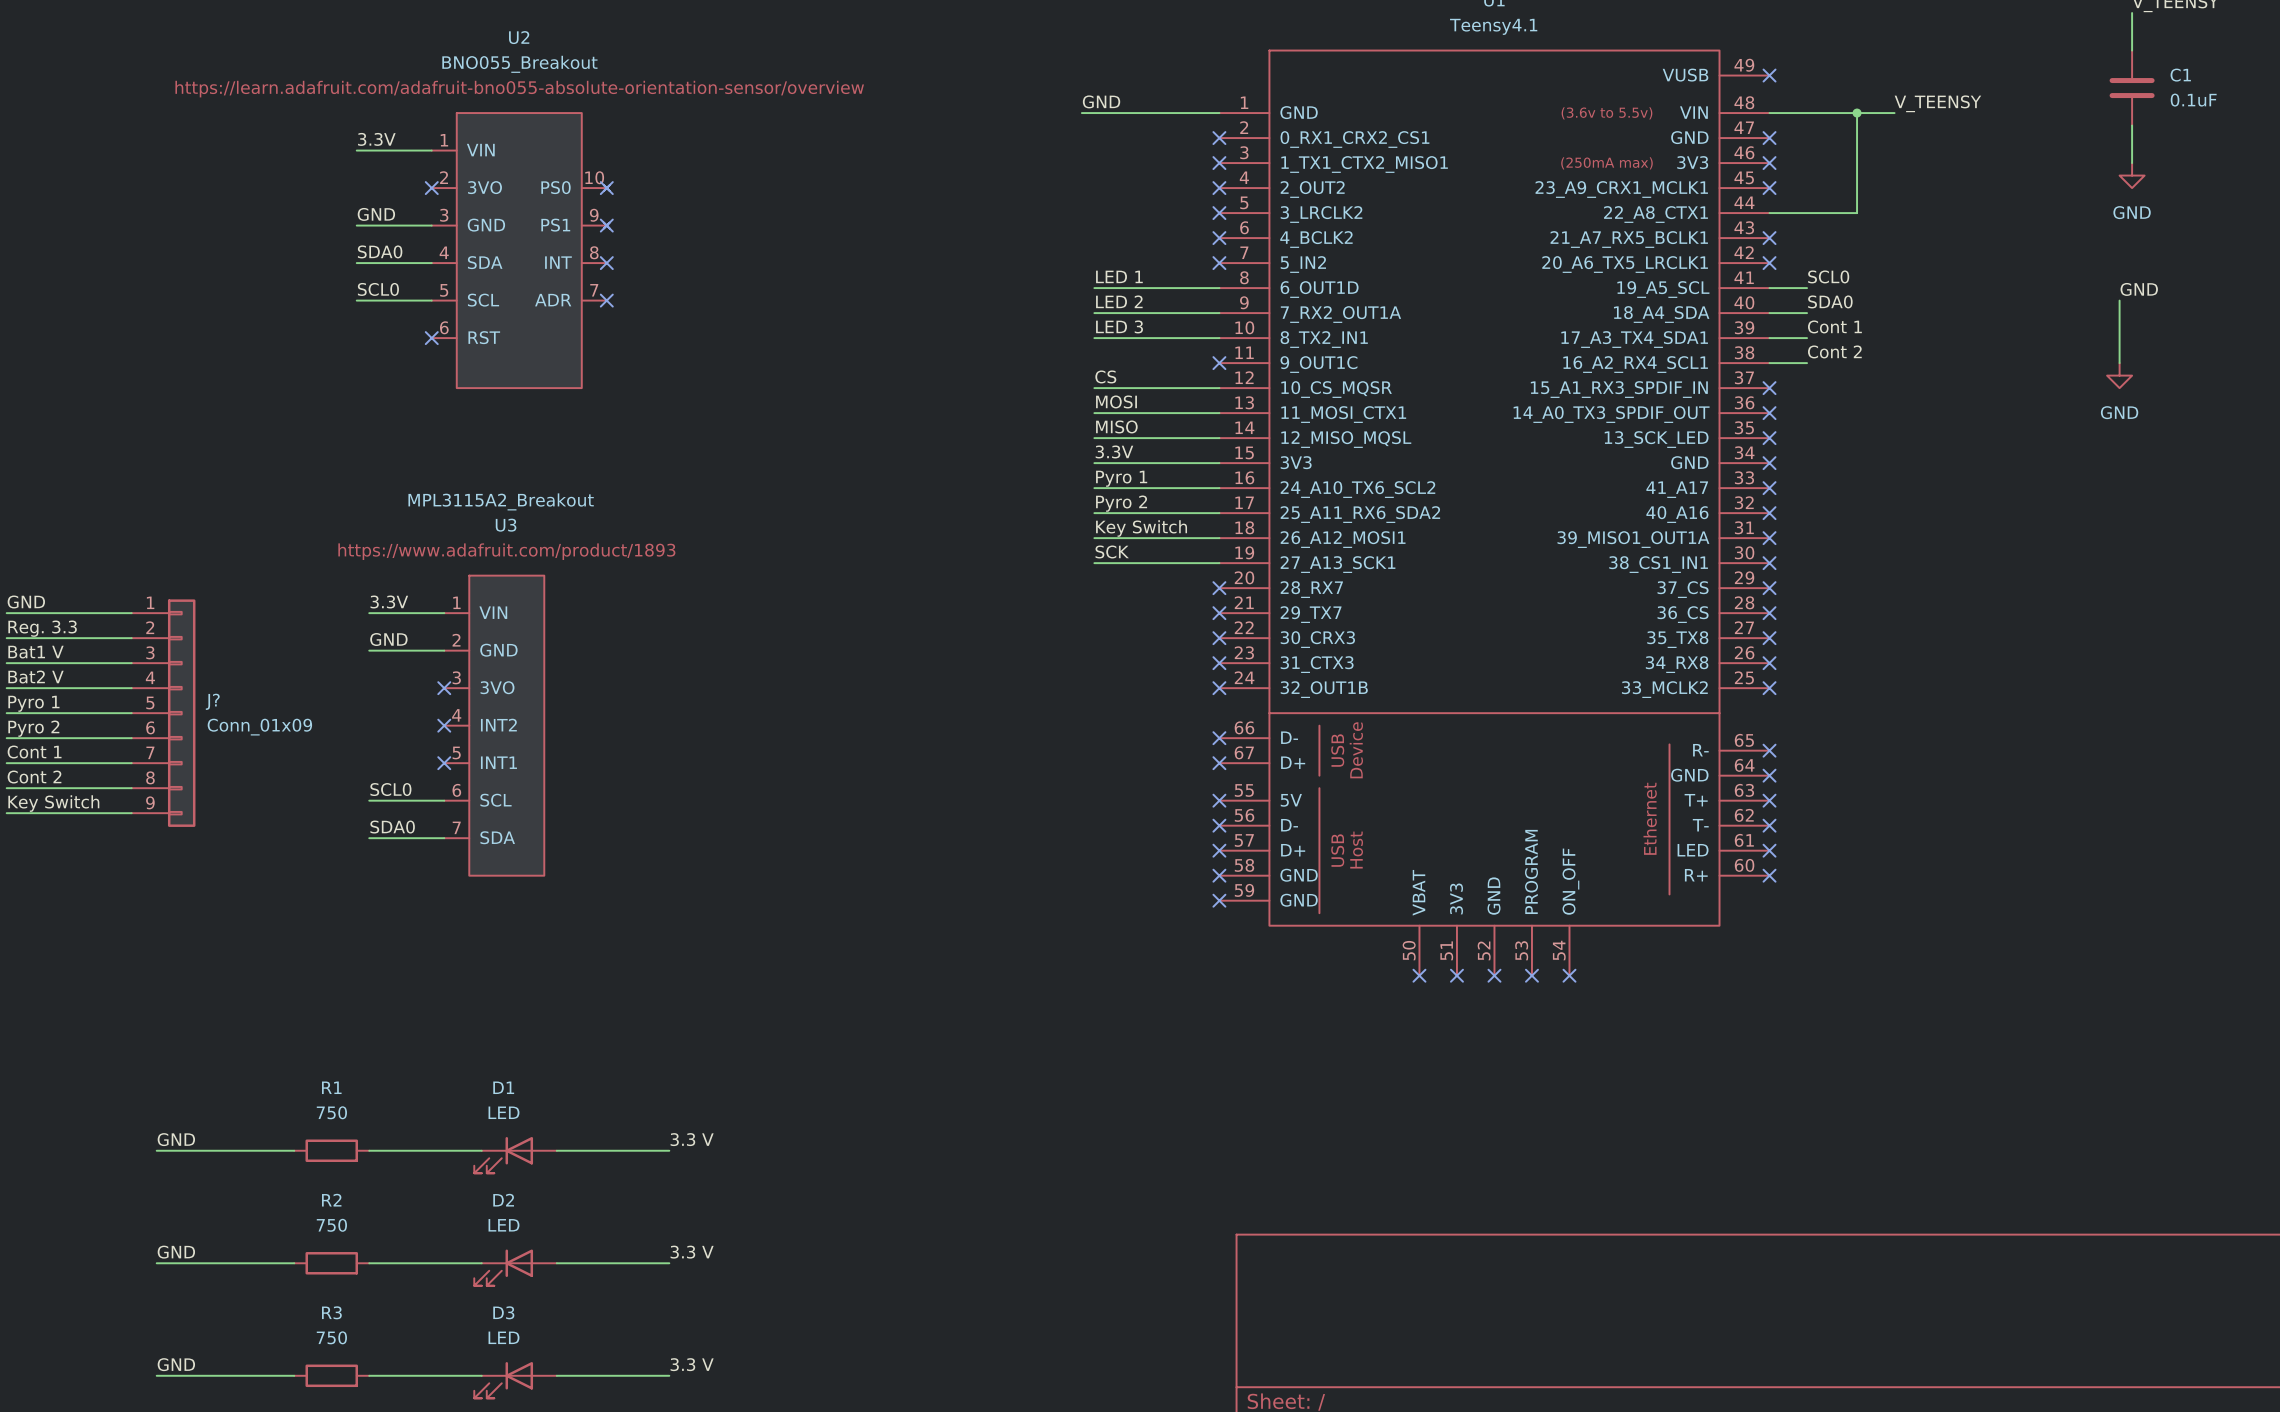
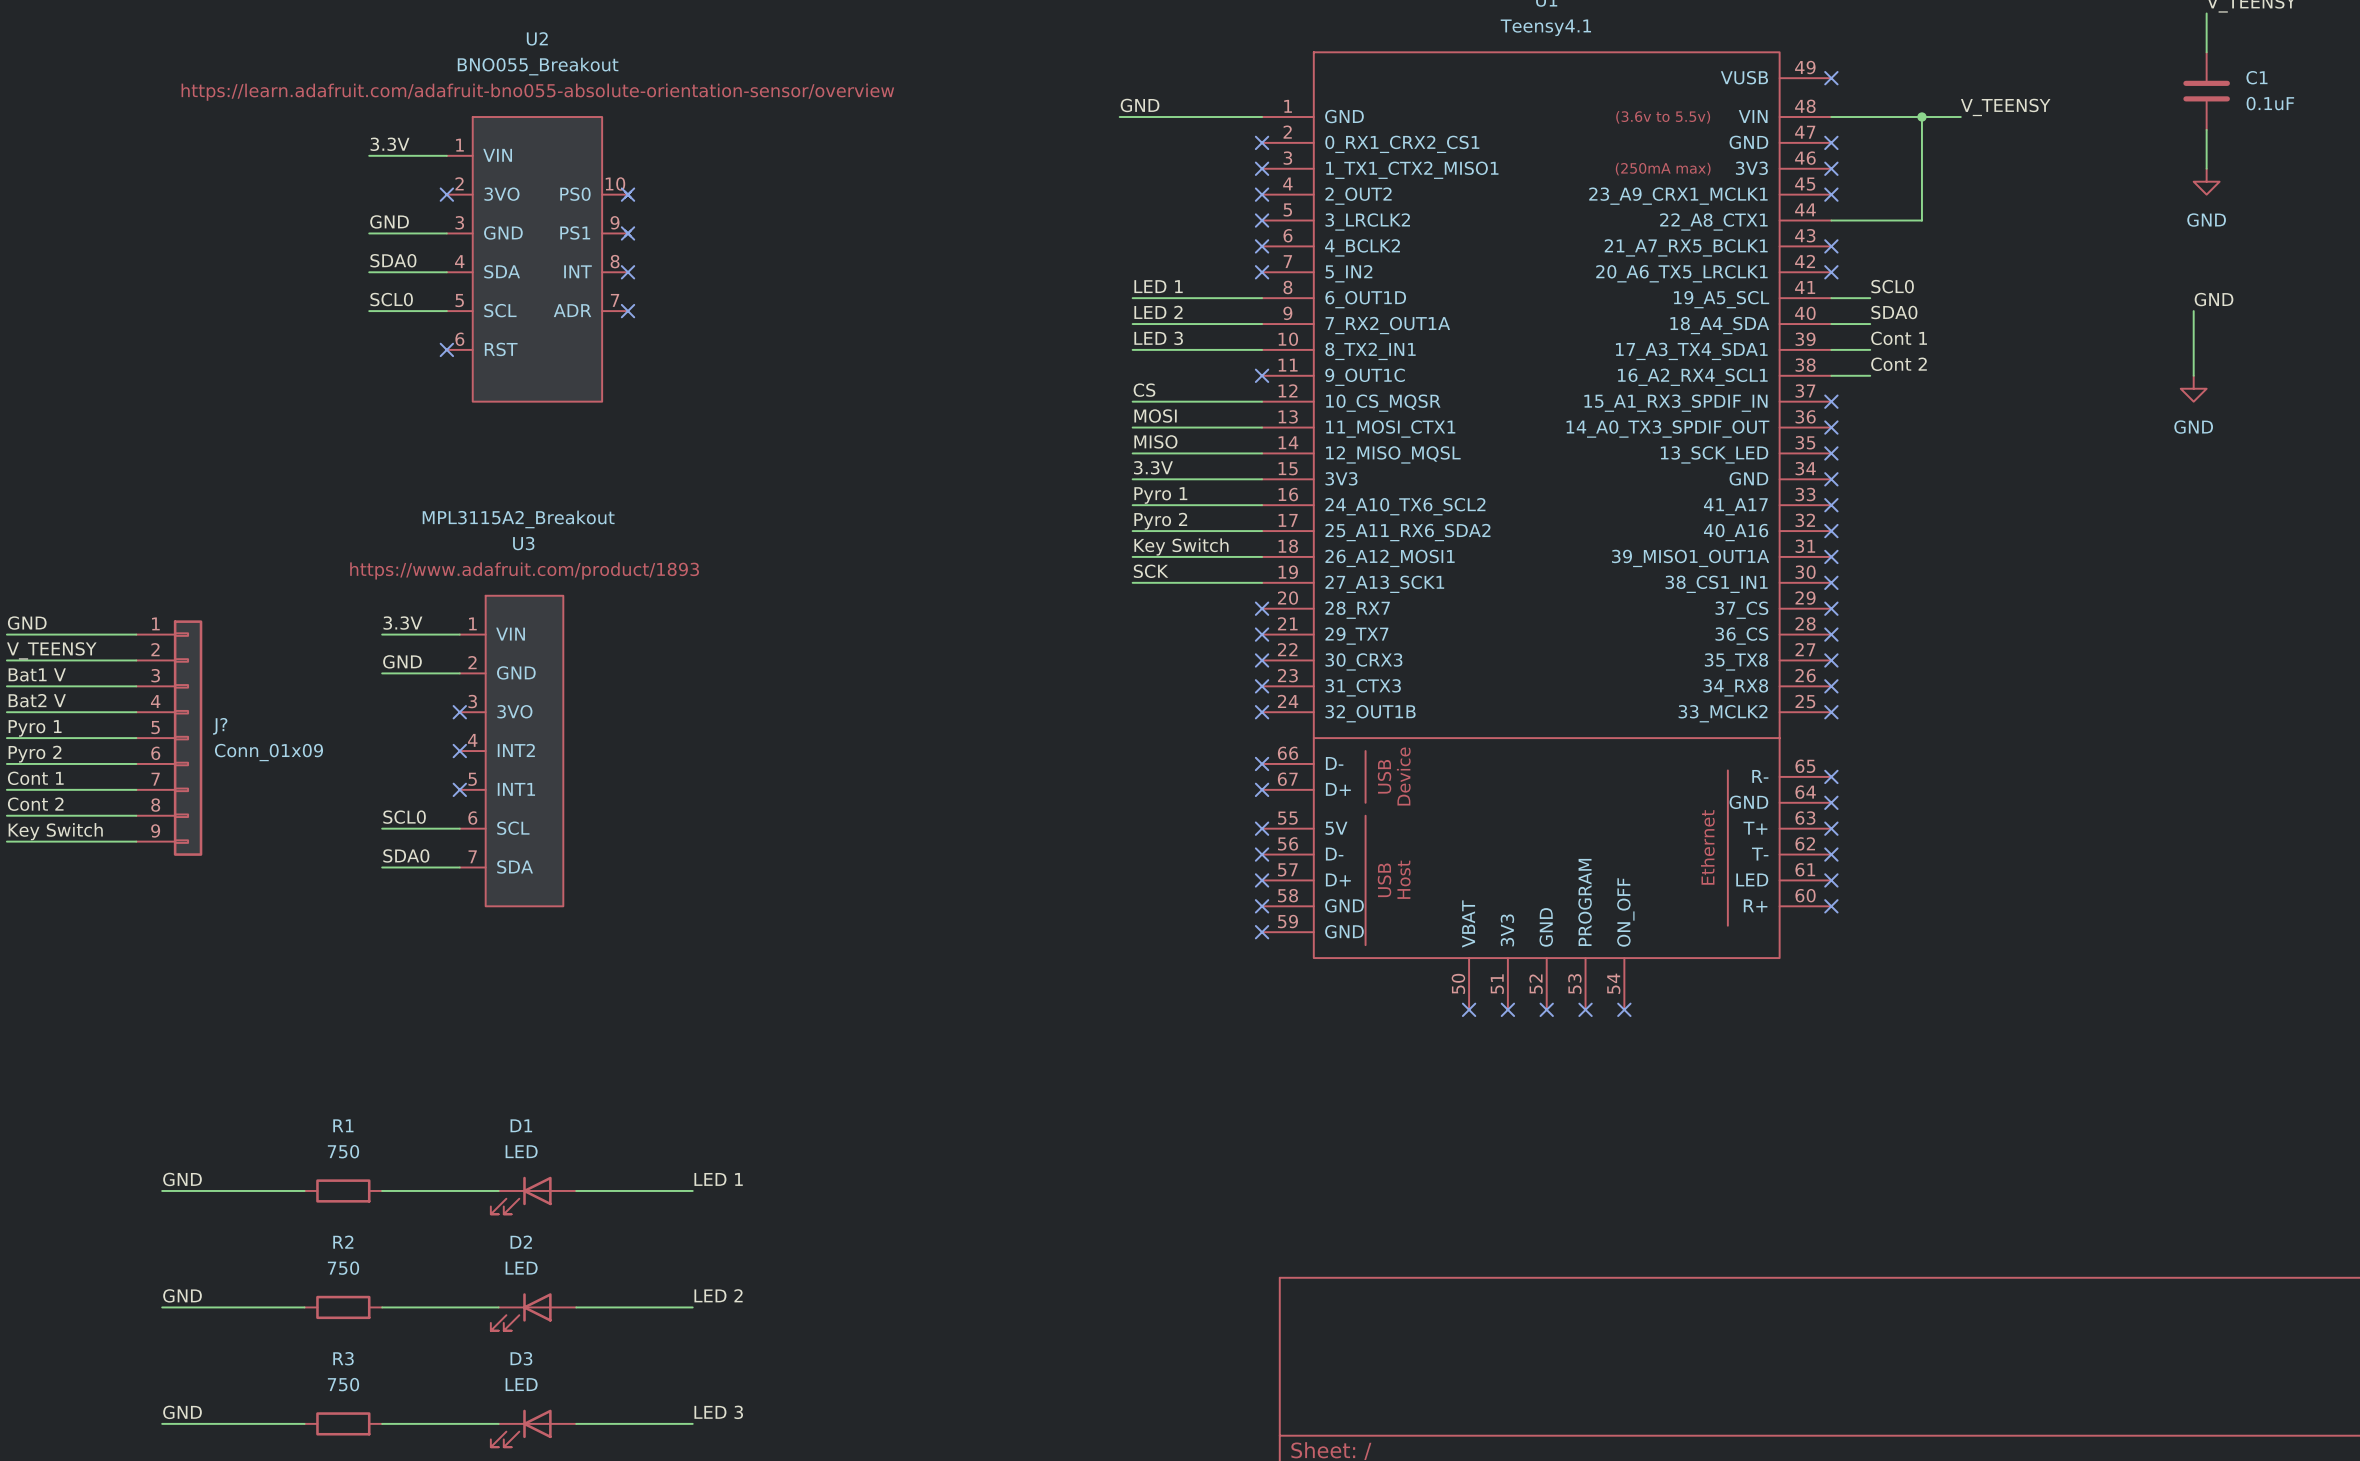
label: Reg. 3.3 (42, 628) -> V_TEENSY (51, 650)
label: 3.3 V (692, 1139) -> LED 1 (718, 1179)
label: 3.3 V (692, 1252) -> LED 2 (718, 1295)
label: 3.3 V (692, 1364) -> LED 3 (718, 1412)

